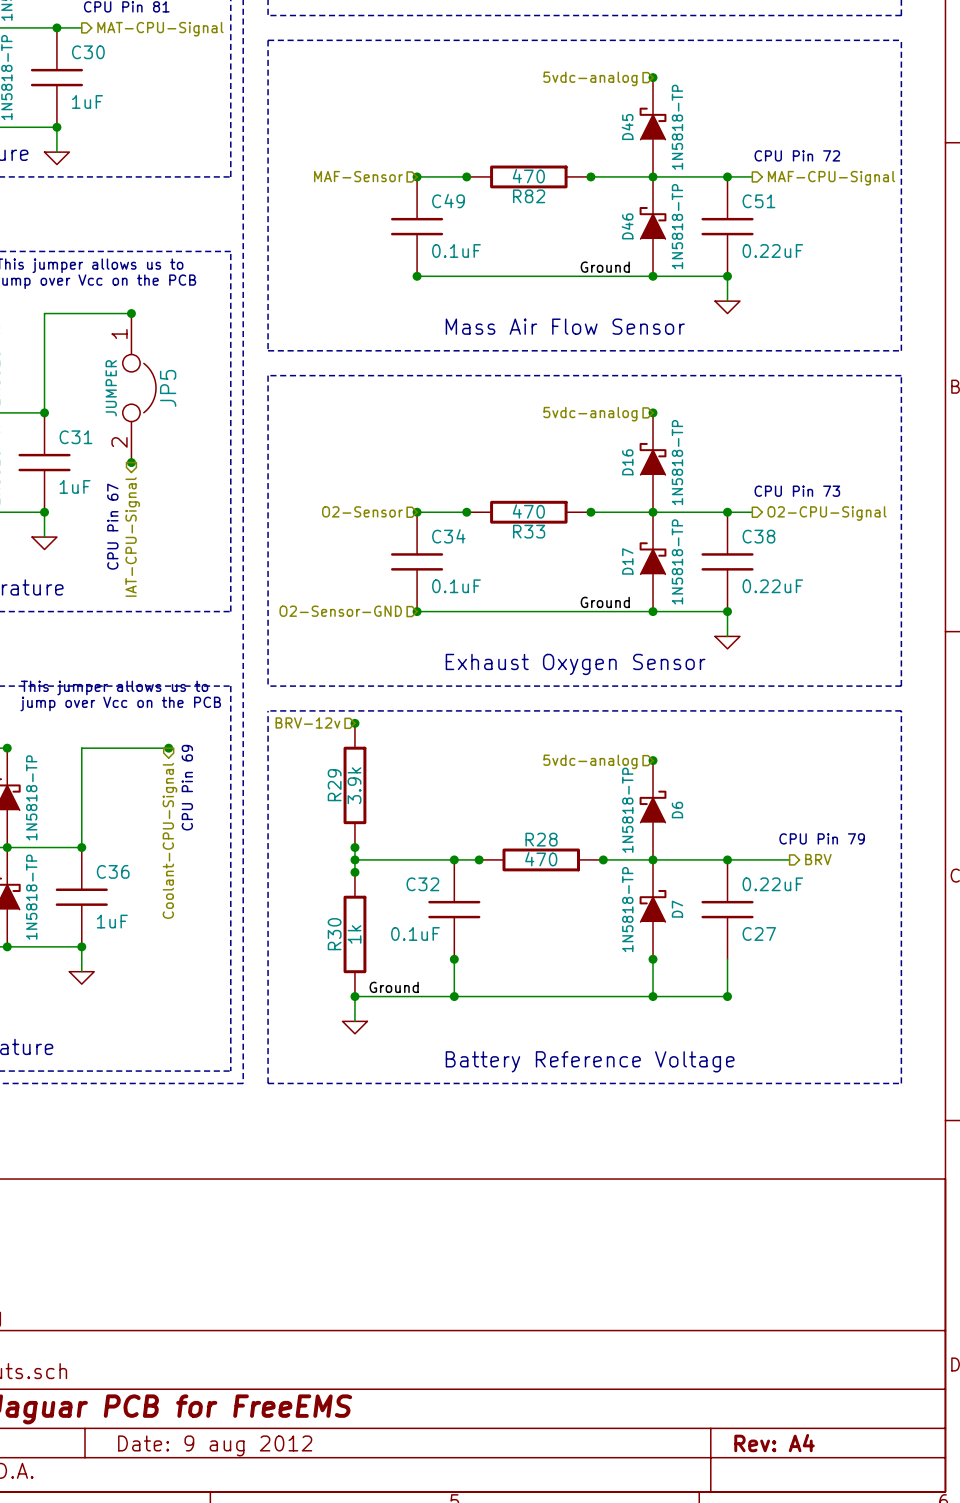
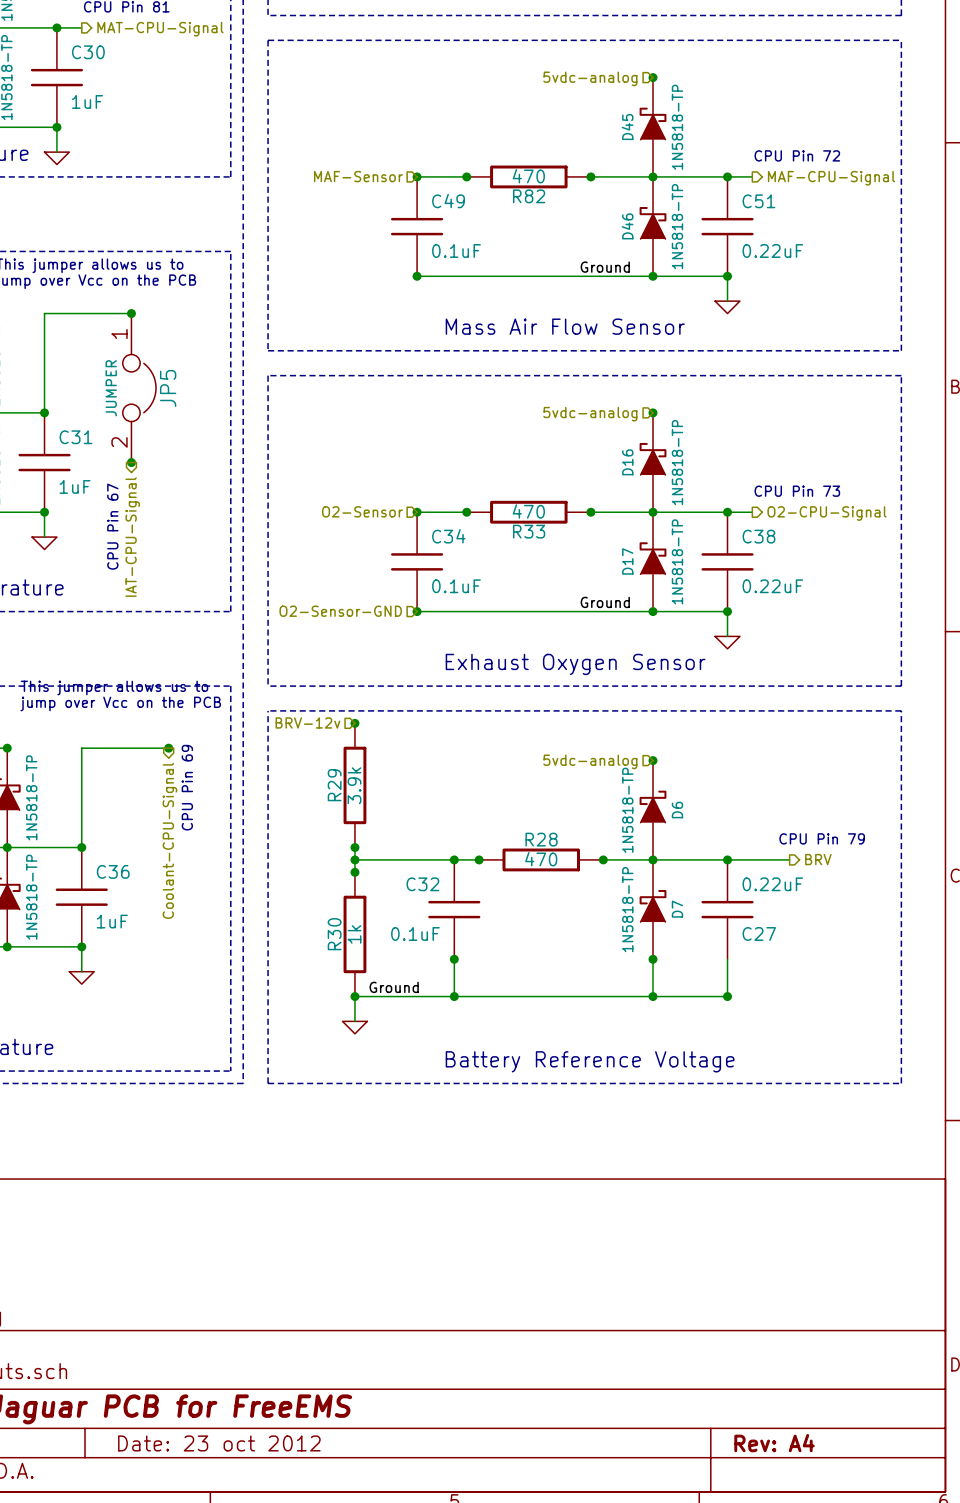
title block: Date: 9 aug 2012 (215, 1445) -> Date: 23 oct 2012 (219, 1443)

